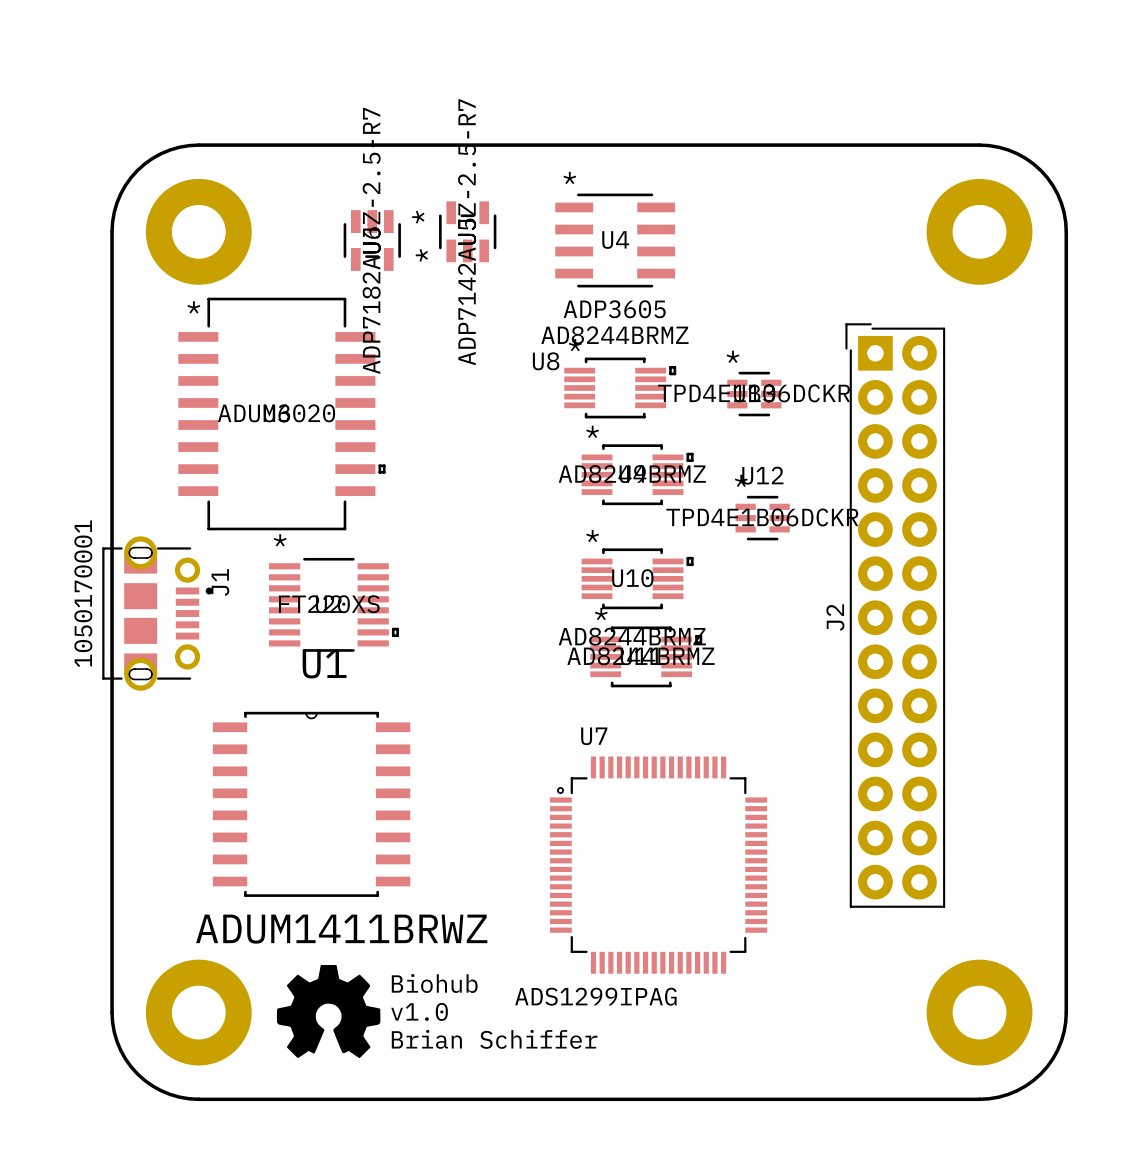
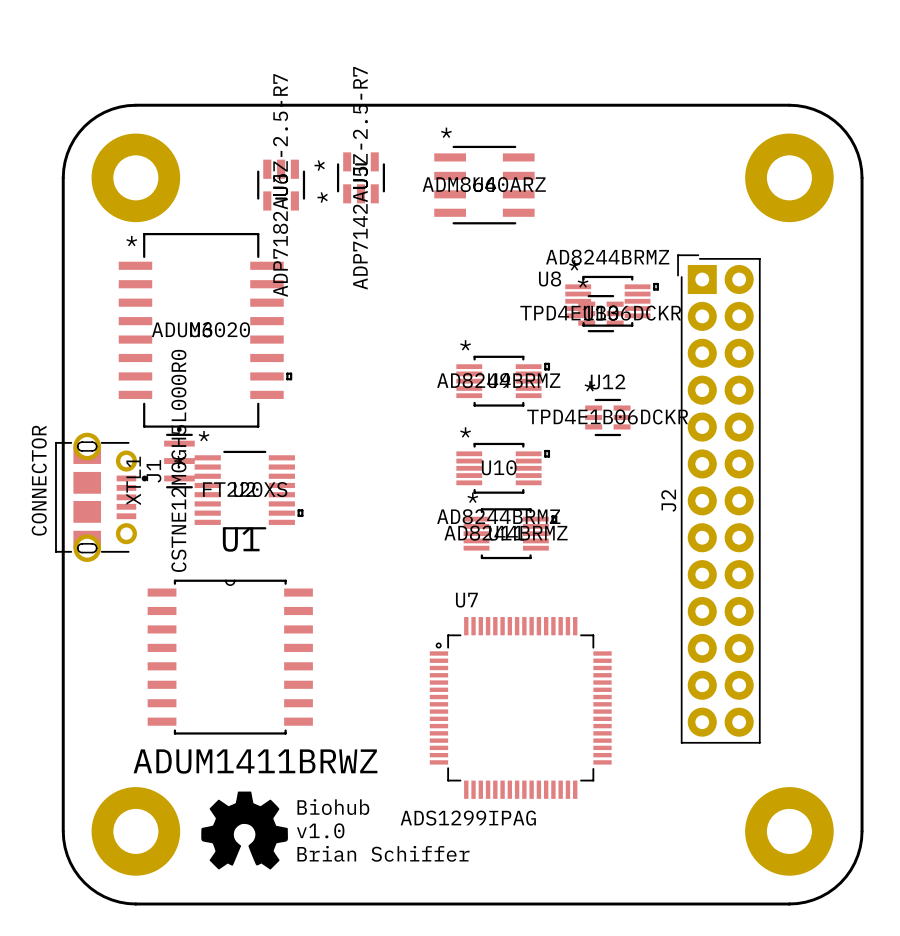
U4 value: ADP3605 (614, 309) -> ADM8660ARZ (484, 184)
U8 position: (620, 387) -> (612, 301)
XTL1: none -> CSTNE12M0GH5L000R0 (179, 457)
J1 value: 1050170001 (83, 593) -> CONNECTOR (39, 480)

